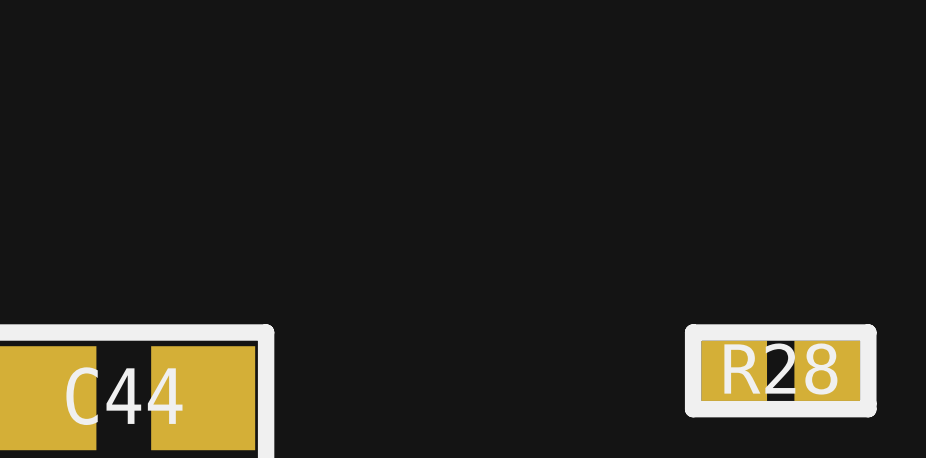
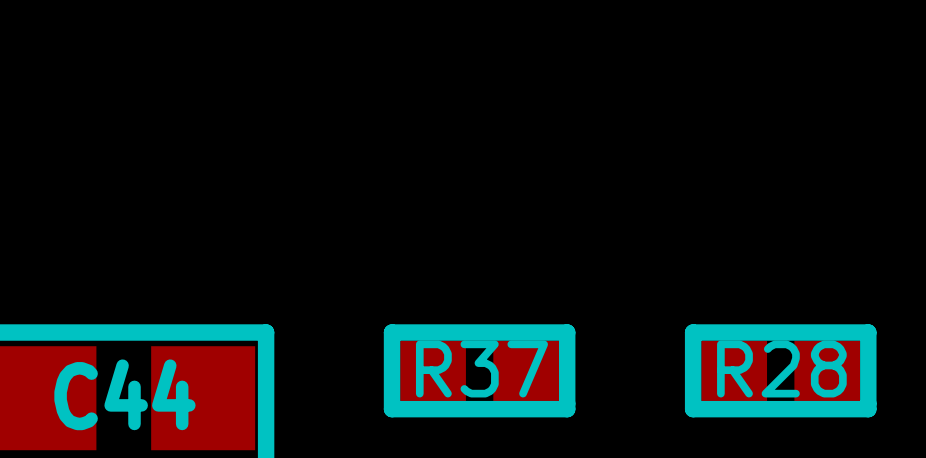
R37: none -> (479, 370)

